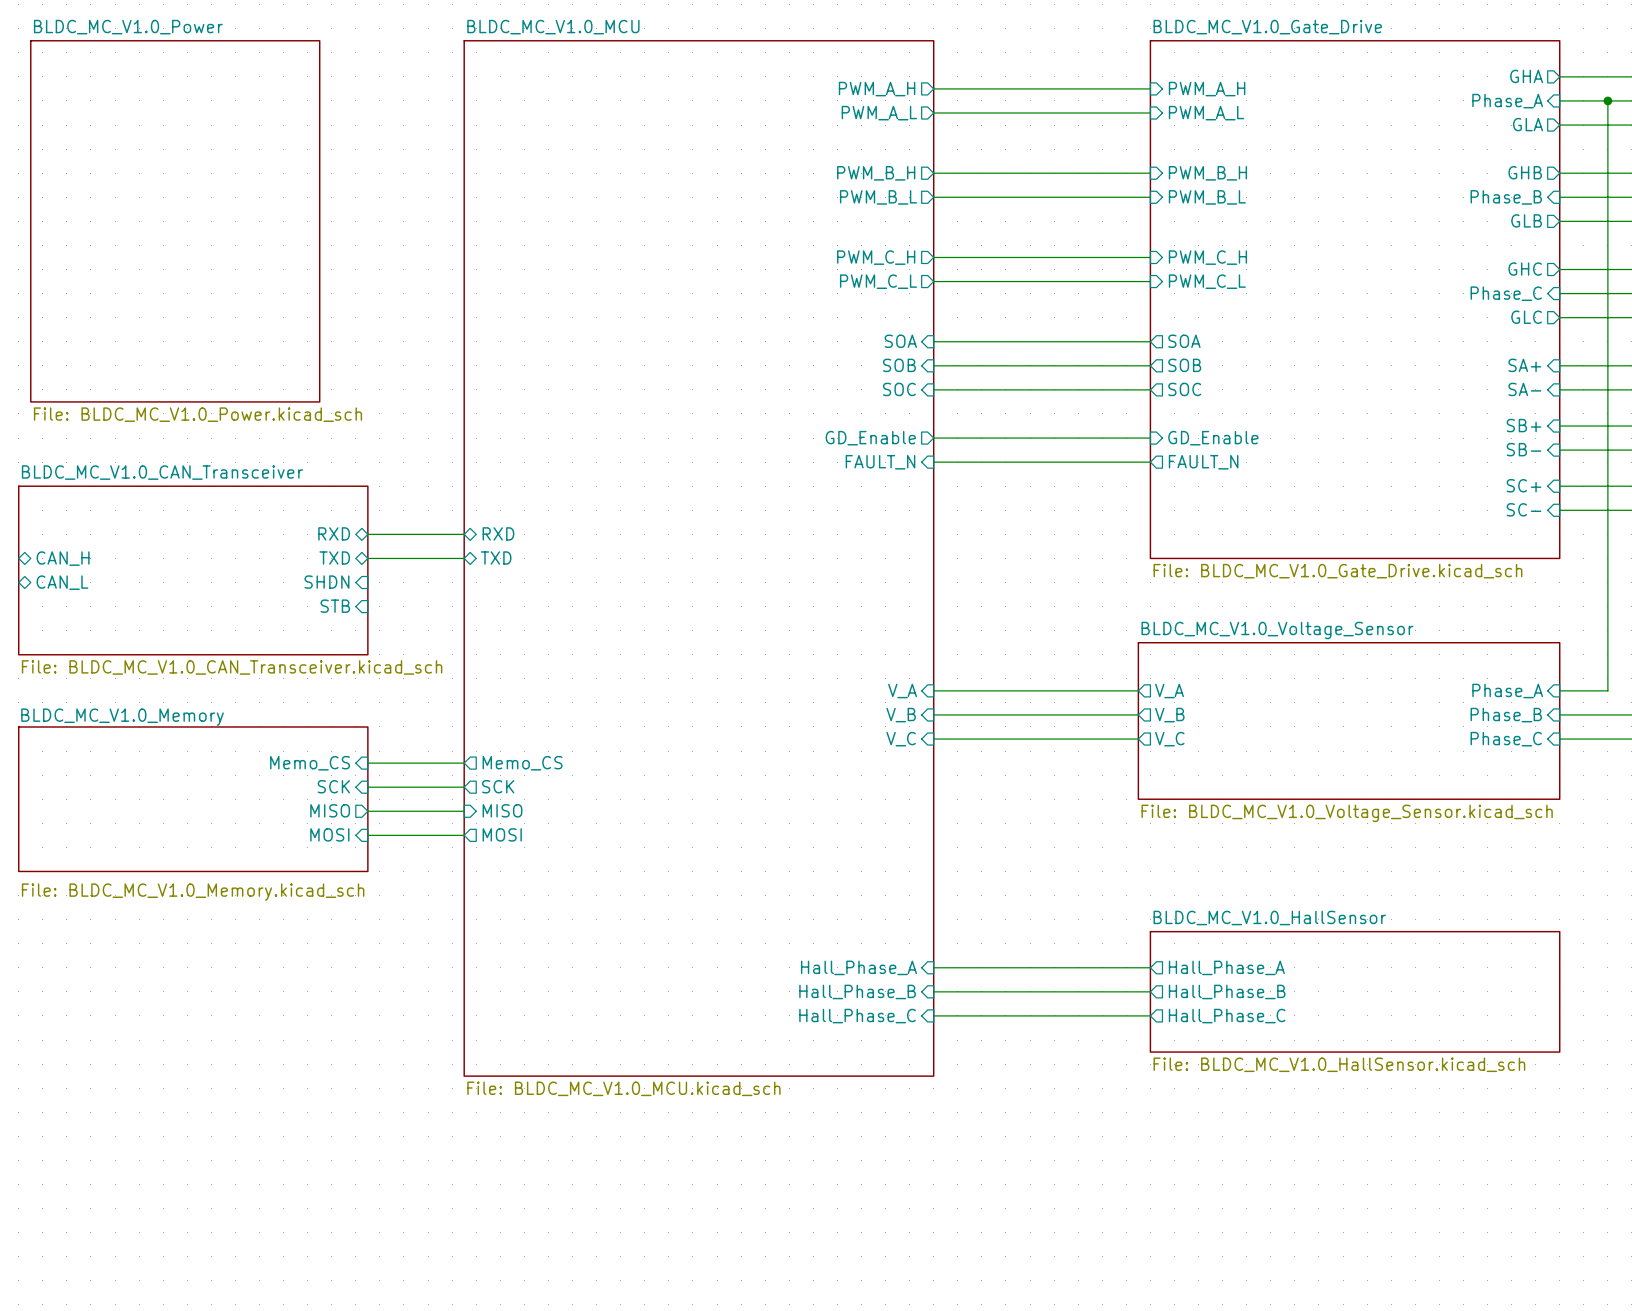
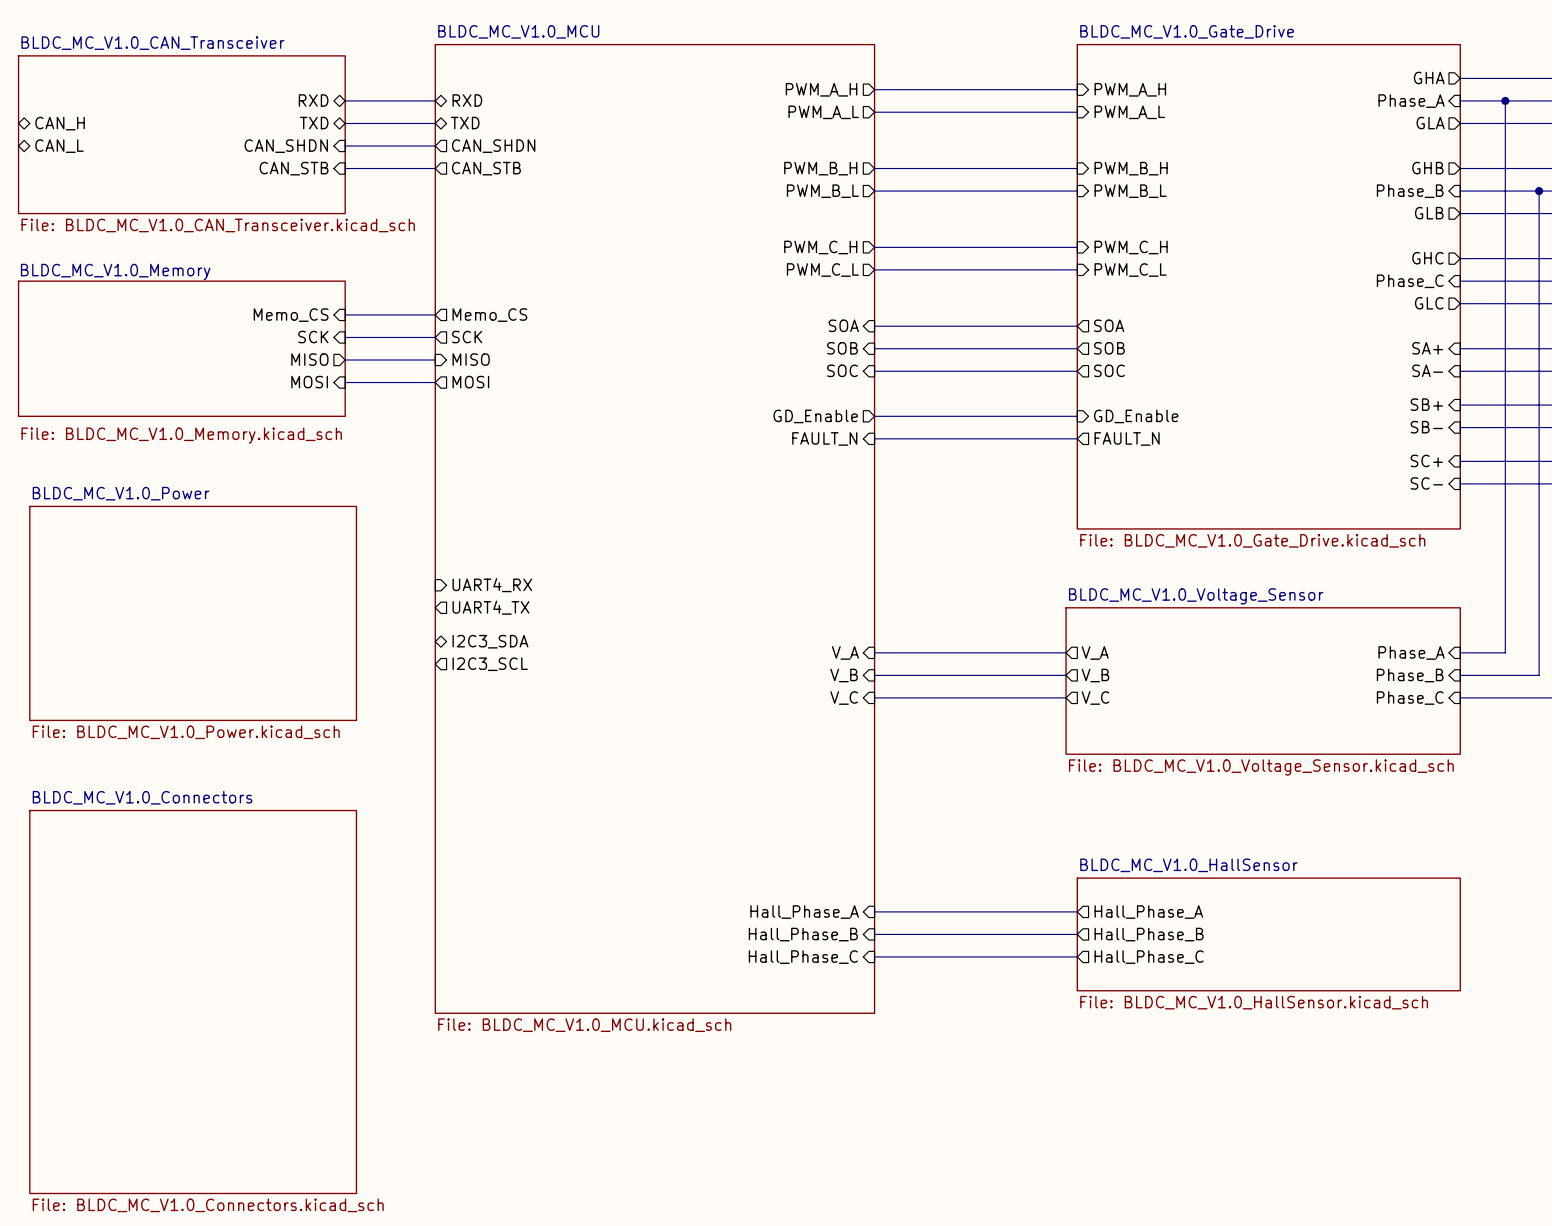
sheet BLDC_MC_V1.0_Power name position: BLDC_MC_V1.0_Power (128, 27) -> BLDC_MC_V1.0_Power (121, 493)
sheet BLDC_MC_V1.0_Power shape: [30, 40, 321, 403] -> [29, 505, 358, 722]
sheet pin: none -> RXD (313, 100)
wire: none -> (345, 100) (435, 100)
sheet pin: none -> RXD (467, 100)
sheet pin: none -> TXD (314, 123)
sheet pin: none -> TXD (465, 123)
sheet pin: none -> CAN_H (60, 123)
wire: none -> (345, 123) (435, 123)
sheet pin: none -> CAN_L (59, 146)
sheet pin: none -> CAN_SHDN (286, 146)
wire: none -> (345, 146) (435, 146)
sheet pin: none -> CAN_SHDN (493, 146)
sheet pin: none -> CAN_STB (294, 168)
wire: none -> (345, 168) (435, 168)
sheet pin: none -> CAN_STB (486, 168)
sheet pin: none -> Memo_CS (291, 315)
wire: none -> (345, 314) (435, 314)
sheet pin: none -> Memo_CS (489, 315)
sheet pin: none -> SCK (313, 337)
wire: none -> (345, 337) (435, 337)
sheet pin: none -> SCK (467, 337)
sheet pin: none -> MISO (309, 359)
sheet pin: none -> MISO (471, 359)
sheet pin: none -> MOSI (309, 382)
sheet pin: none -> MOSI (470, 382)
sheet BLDC_MC_V1.0_Power value position: File: BLDC_MC_V1.0_Power.kicad_sch (197, 414) -> File: BLDC_MC_V1.0_Power.kicad_sch (186, 732)
sheet pin: RXD (334, 533) -> none
sheet pin: RXD (498, 533) -> none
wire: (367, 534) (464, 534) -> (345, 360) (435, 360)
sheet pin: CAN_H (63, 558) -> none
sheet pin: TXD (334, 558) -> none
wire: (367, 558) (464, 558) -> (345, 382) (435, 382)
sheet pin: TXD (496, 558) -> none
sheet BLDC_MC_V1.0_CAN_Transceiver position: (193, 570) -> (181, 134)
sheet pin: CAN_L (62, 582) -> none
sheet pin: SHDN (326, 582) -> none
sheet pin: STB (335, 606) -> none
sheet pin: none -> UART4_RX (492, 585)
sheet pin: none -> UART4_TX (490, 607)
sheet pin: none -> I2C3_SDA (490, 641)
sheet pin: none -> I2C3_SCL (490, 664)
sheet pin: Memo_CS (310, 763) -> none
wire: (367, 763) (464, 763) -> none
sheet pin: Memo_CS (522, 763) -> none
sheet pin: SCK (333, 786) -> none
sheet pin: SCK (498, 786) -> none
wire: (367, 787) (464, 787) -> none
sheet BLDC_MC_V1.0_Memory position: (193, 799) -> (181, 348)
sheet pin: MISO (330, 810) -> none
sheet pin: MISO (502, 810) -> none
wire: (367, 811) (464, 811) -> none
sheet pin: MOSI (329, 834) -> none
sheet pin: MOSI (502, 834) -> none
wire: (367, 835) (464, 835) -> none
sheet BLDC_MC_V1.0_Connectors: none -> File: BLDC_MC_V1.0_Connectors.kicad_sch (193, 1002)

